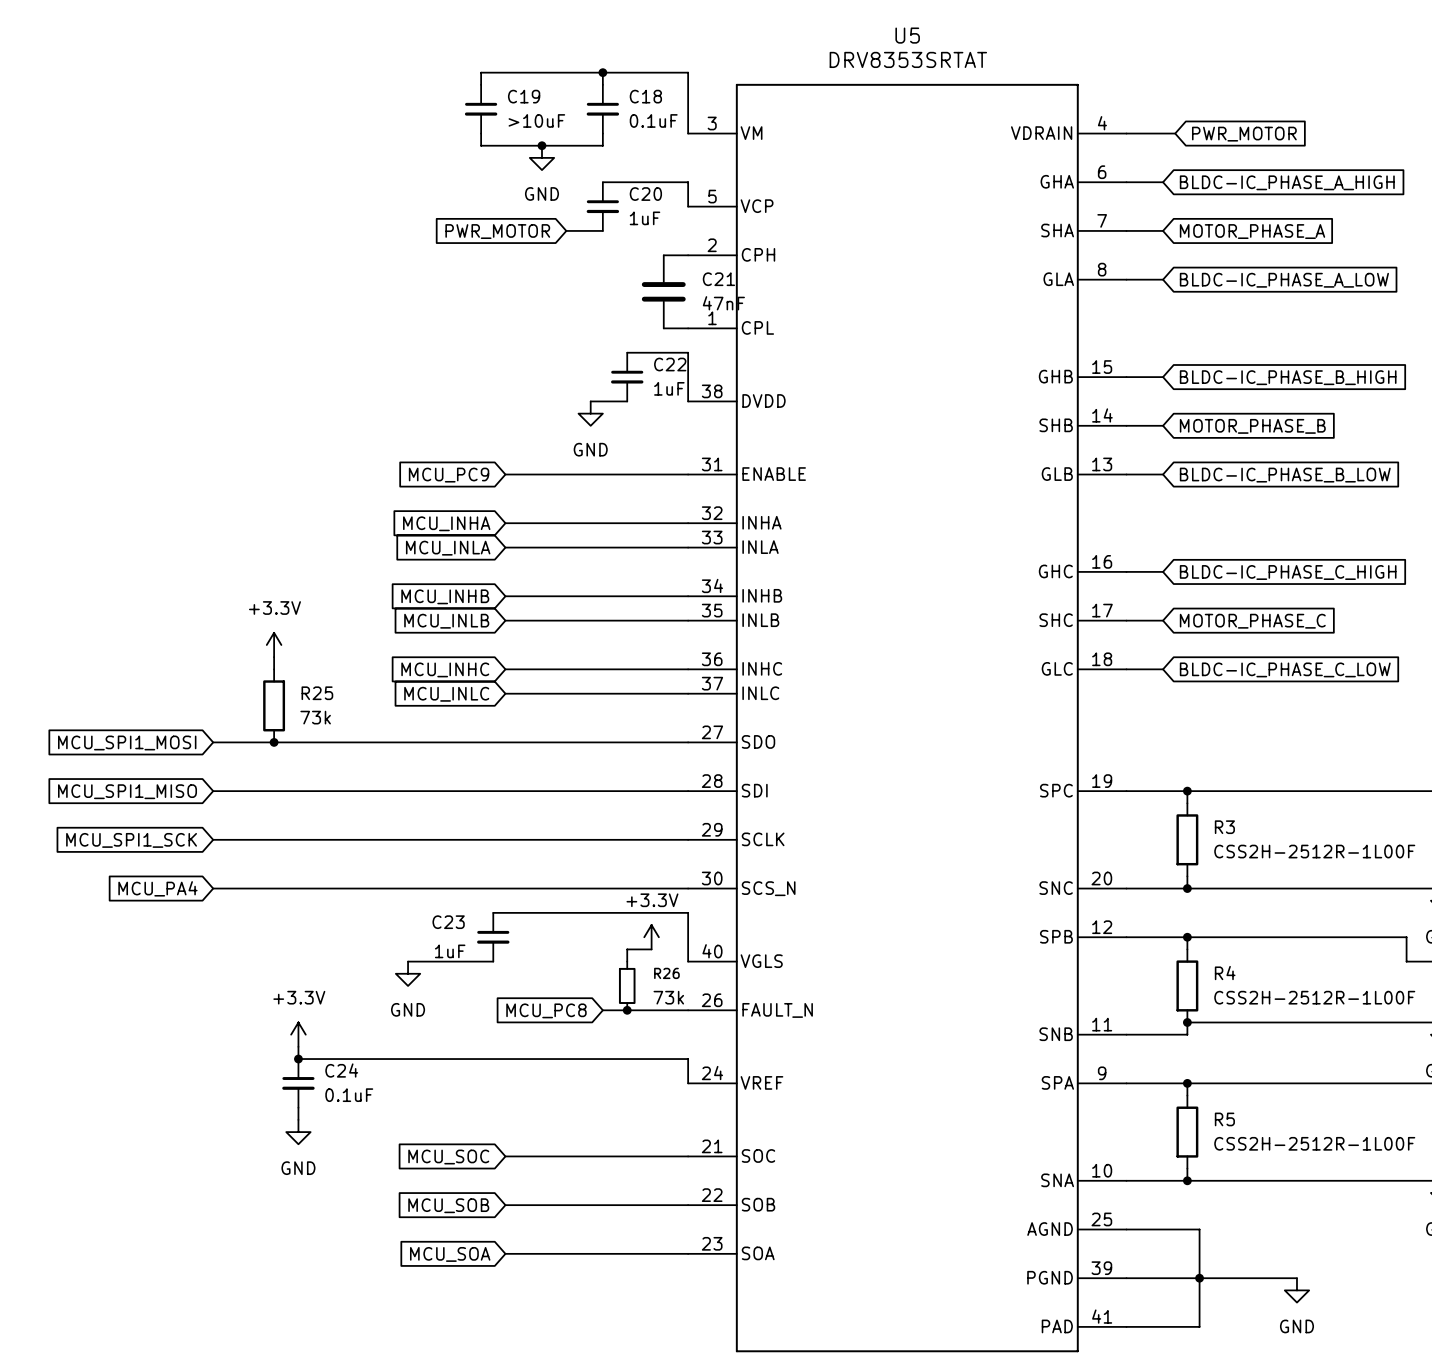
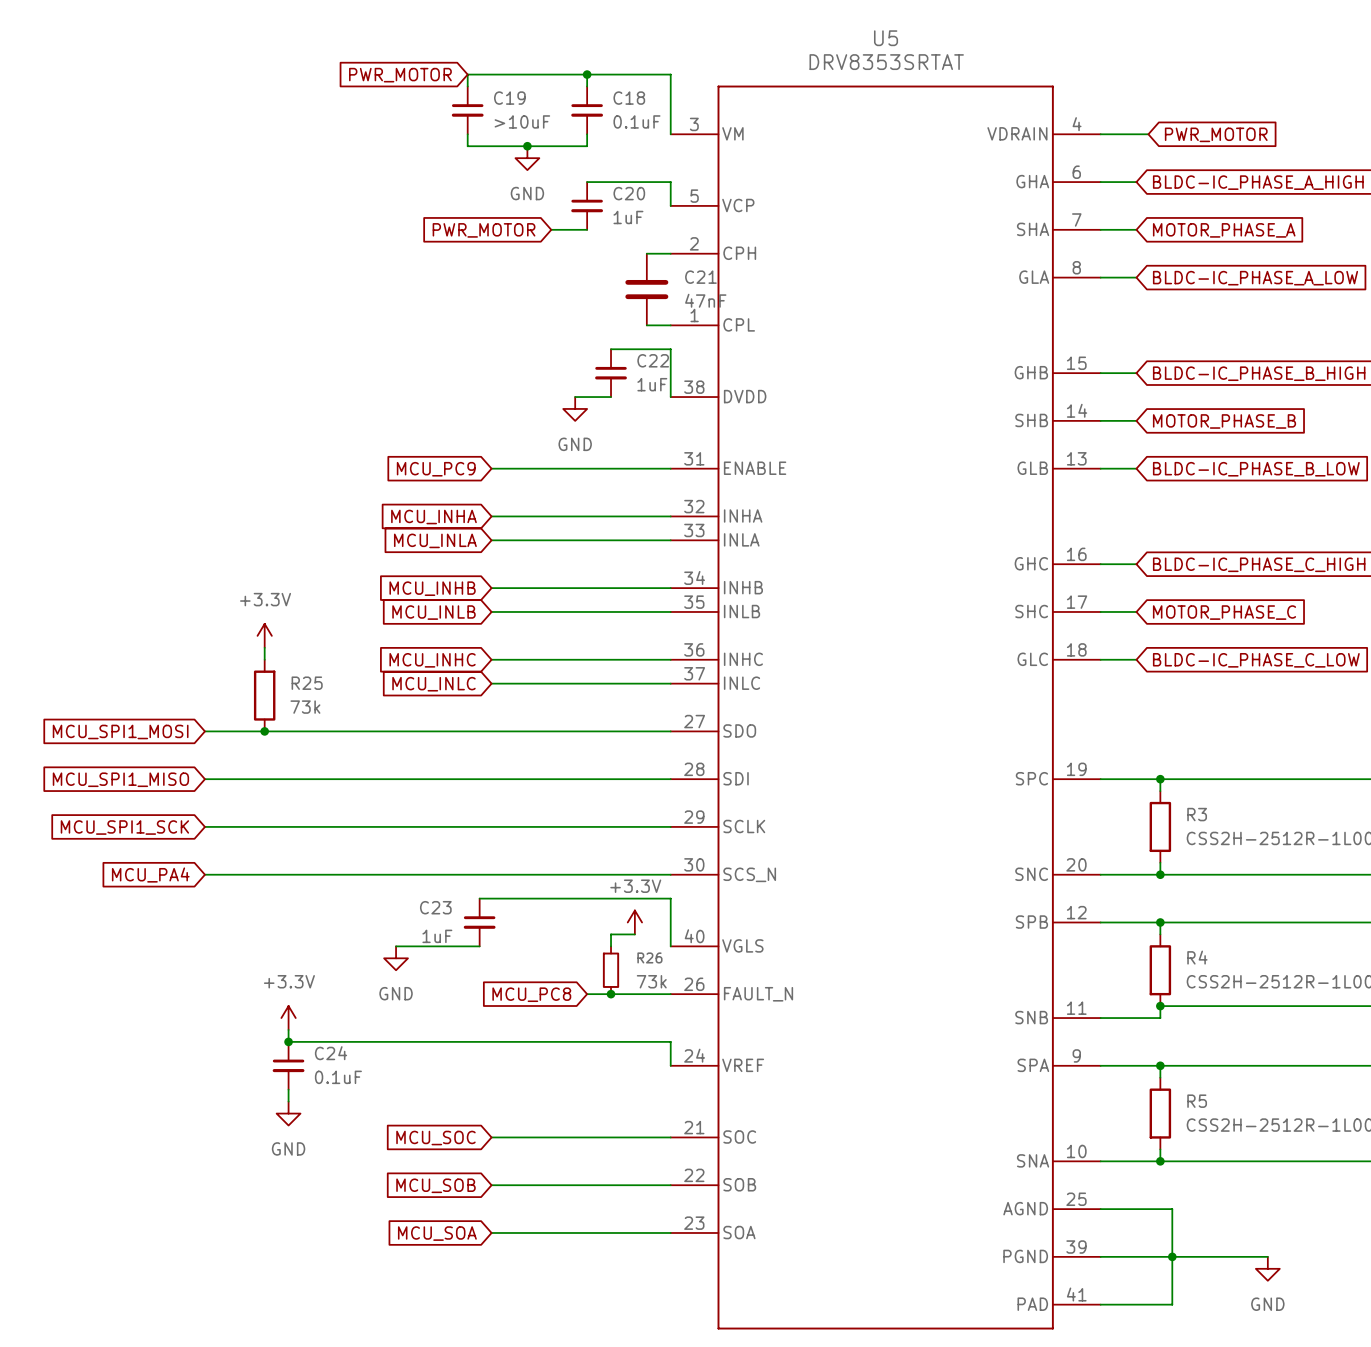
global label: none -> PWR_MOTOR (400, 75)

